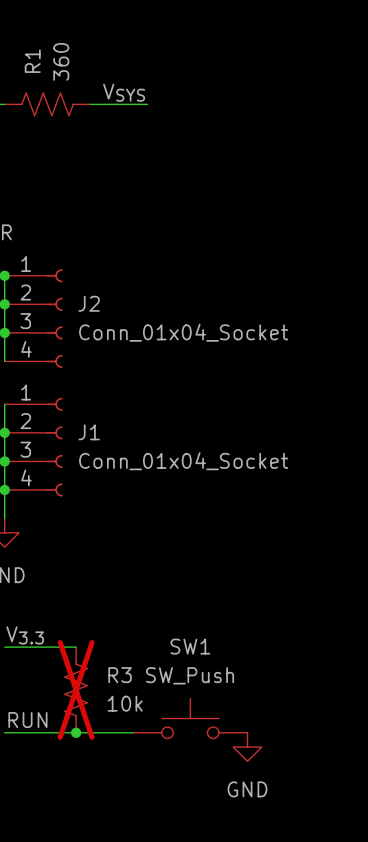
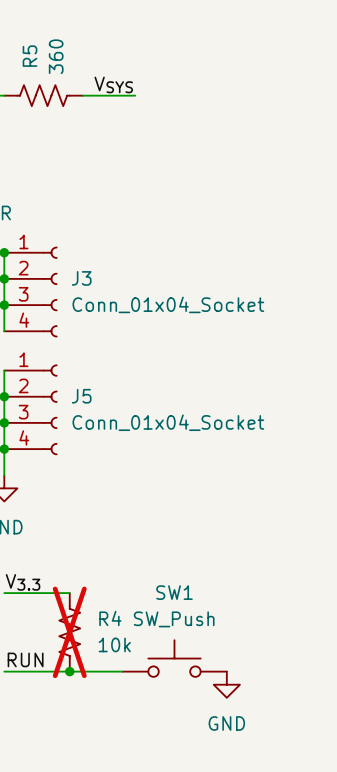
R1 name: R1 (32, 61) -> R5 (30, 56)
J2 name: J2 (89, 303) -> J3 (81, 278)
J1 name: J1 (89, 432) -> J5 (81, 396)
R3 name: R3 (120, 675) -> R4 (110, 618)

